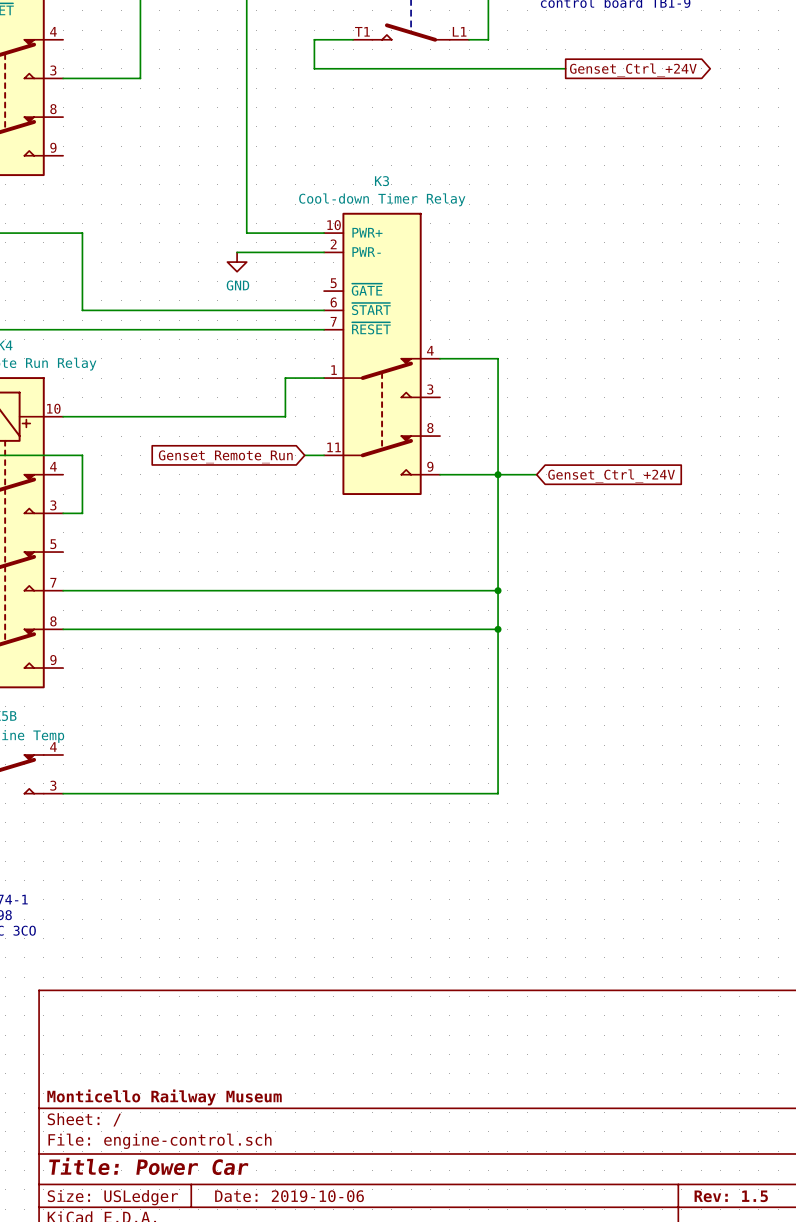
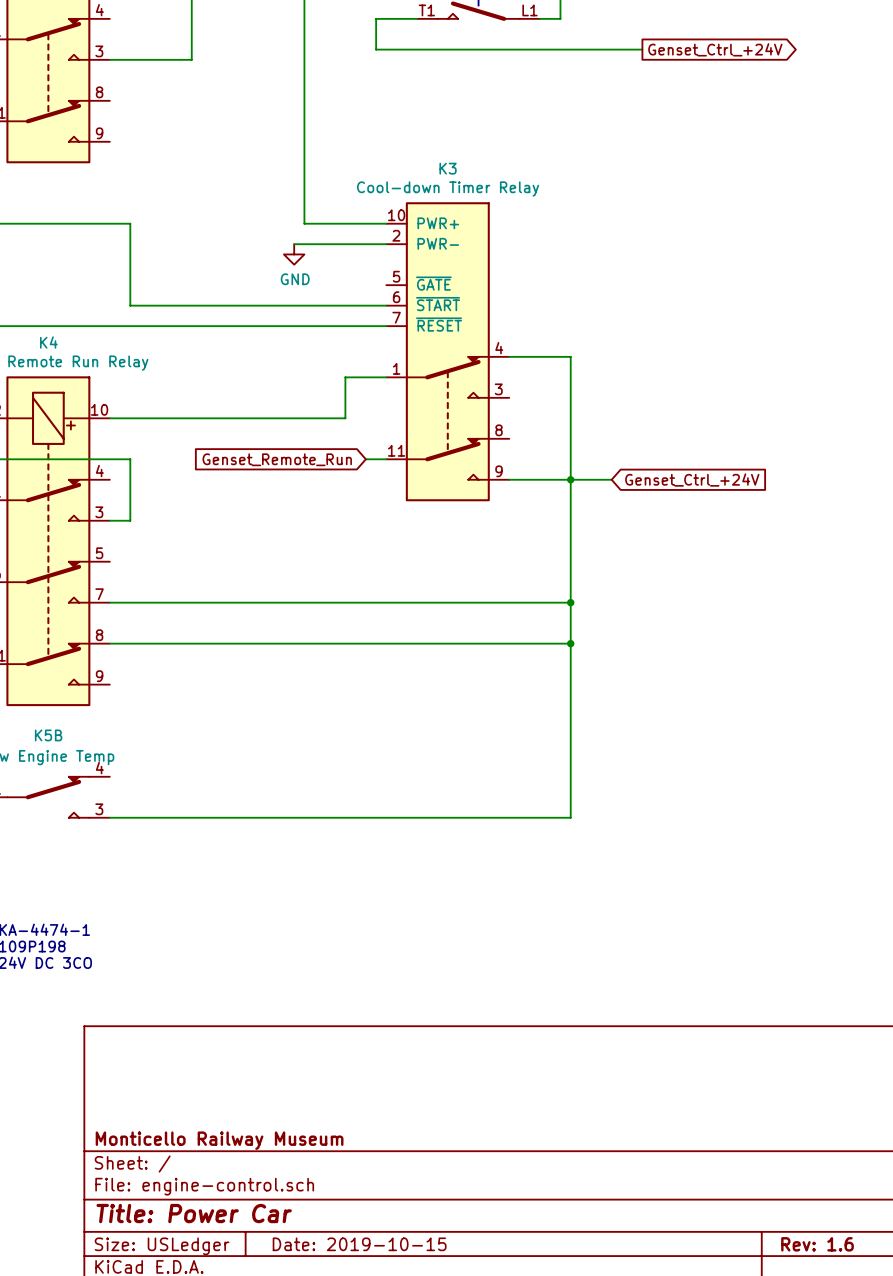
title block: Date: 2019-10-06 (289, 1196) -> Date: 2019-10-15 (359, 1244)
title block: Rev: 1.5 (731, 1196) -> Rev: 1.6 (817, 1244)

